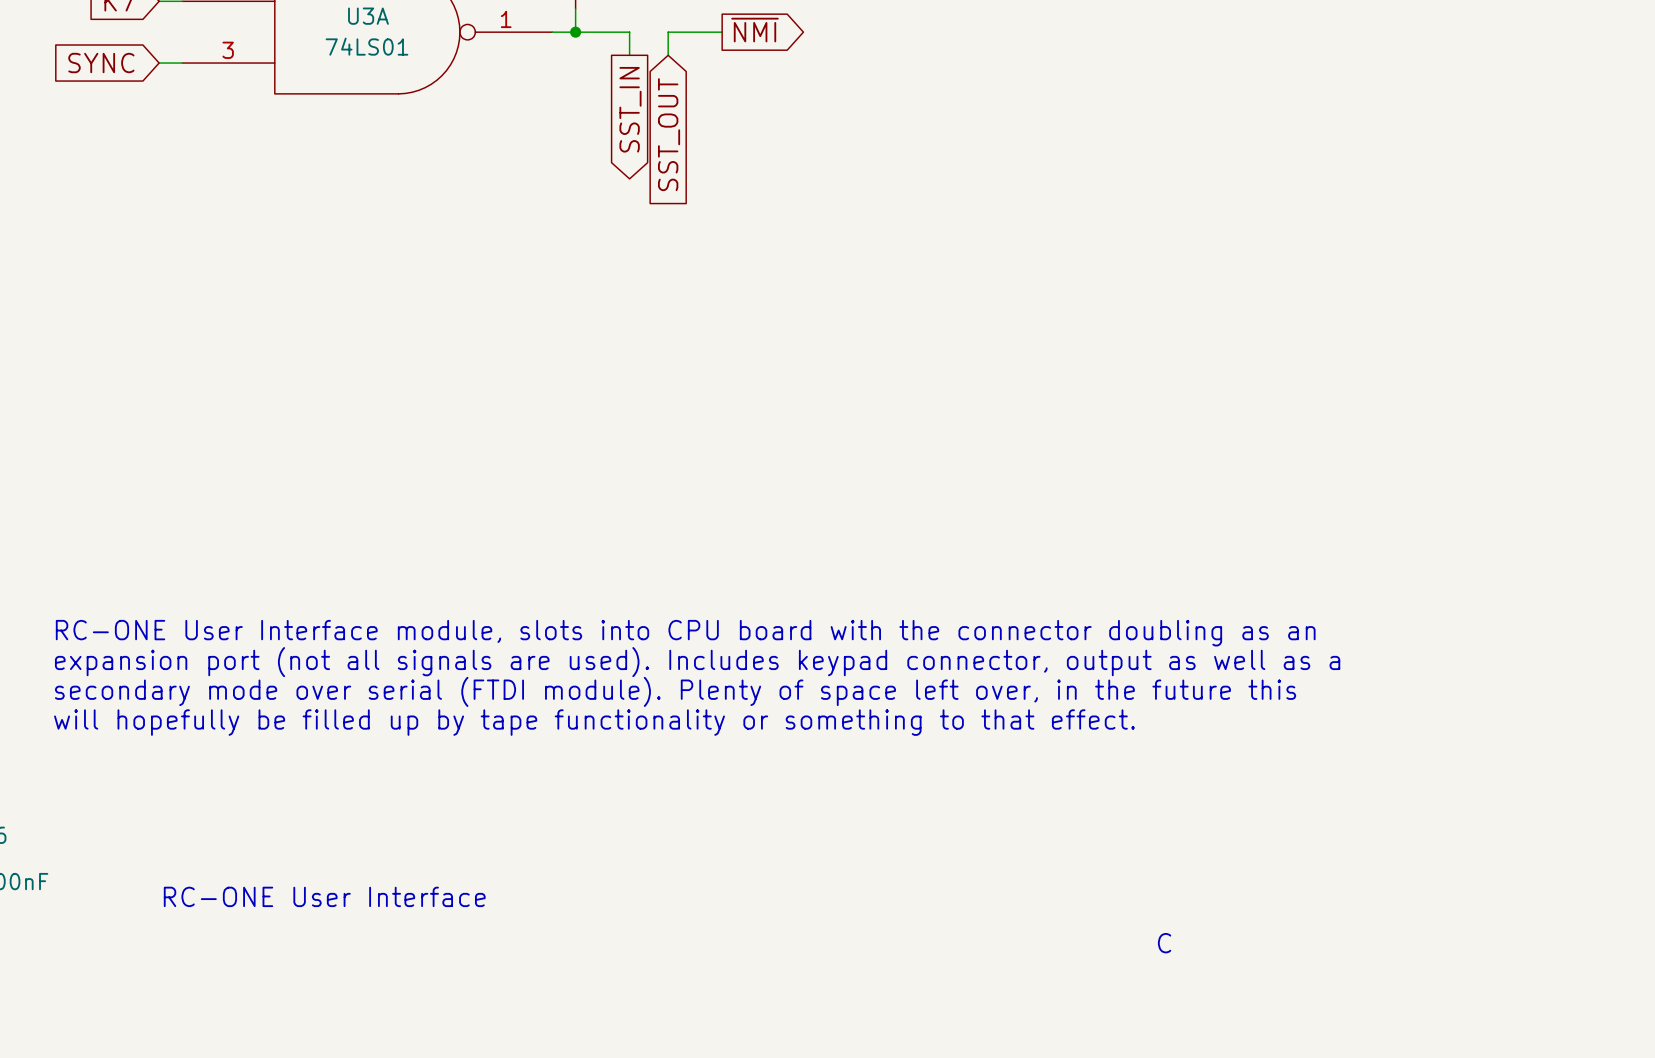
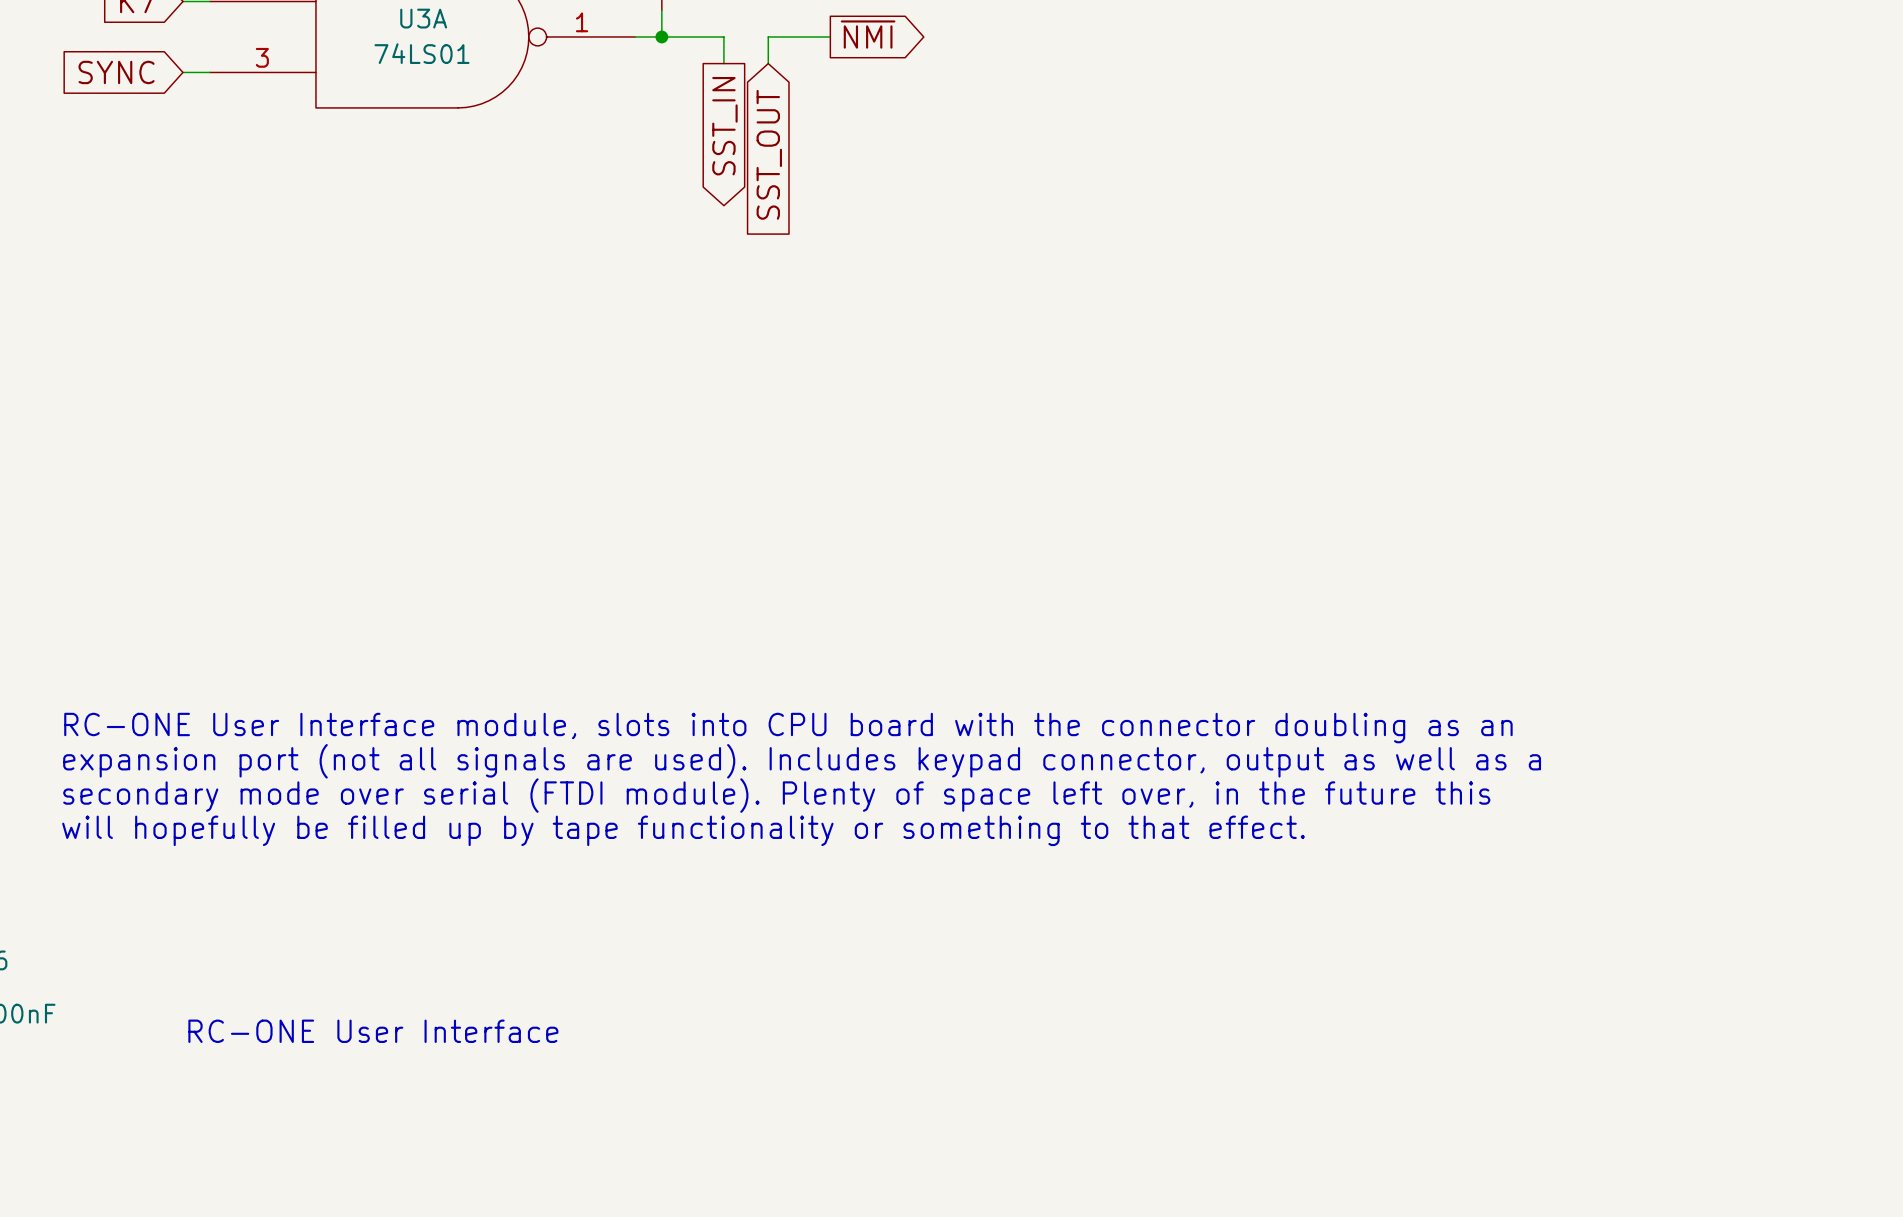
text: C (1164, 943) -> none

